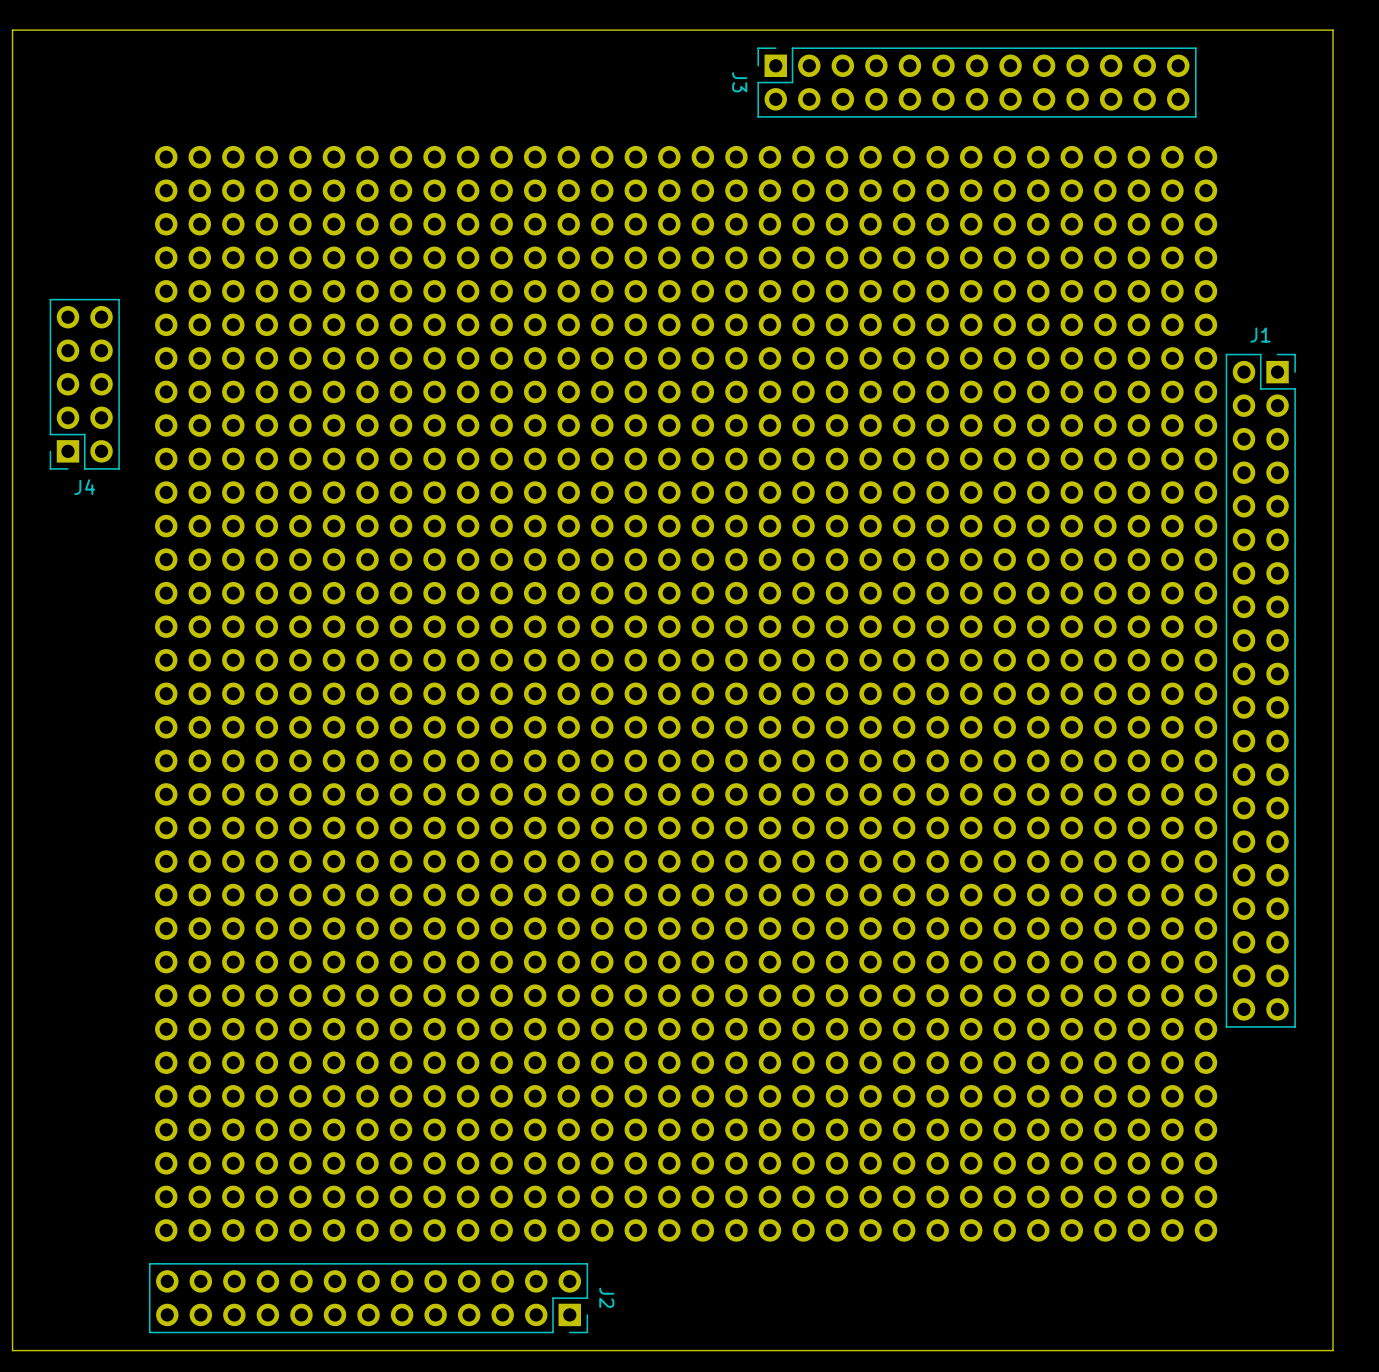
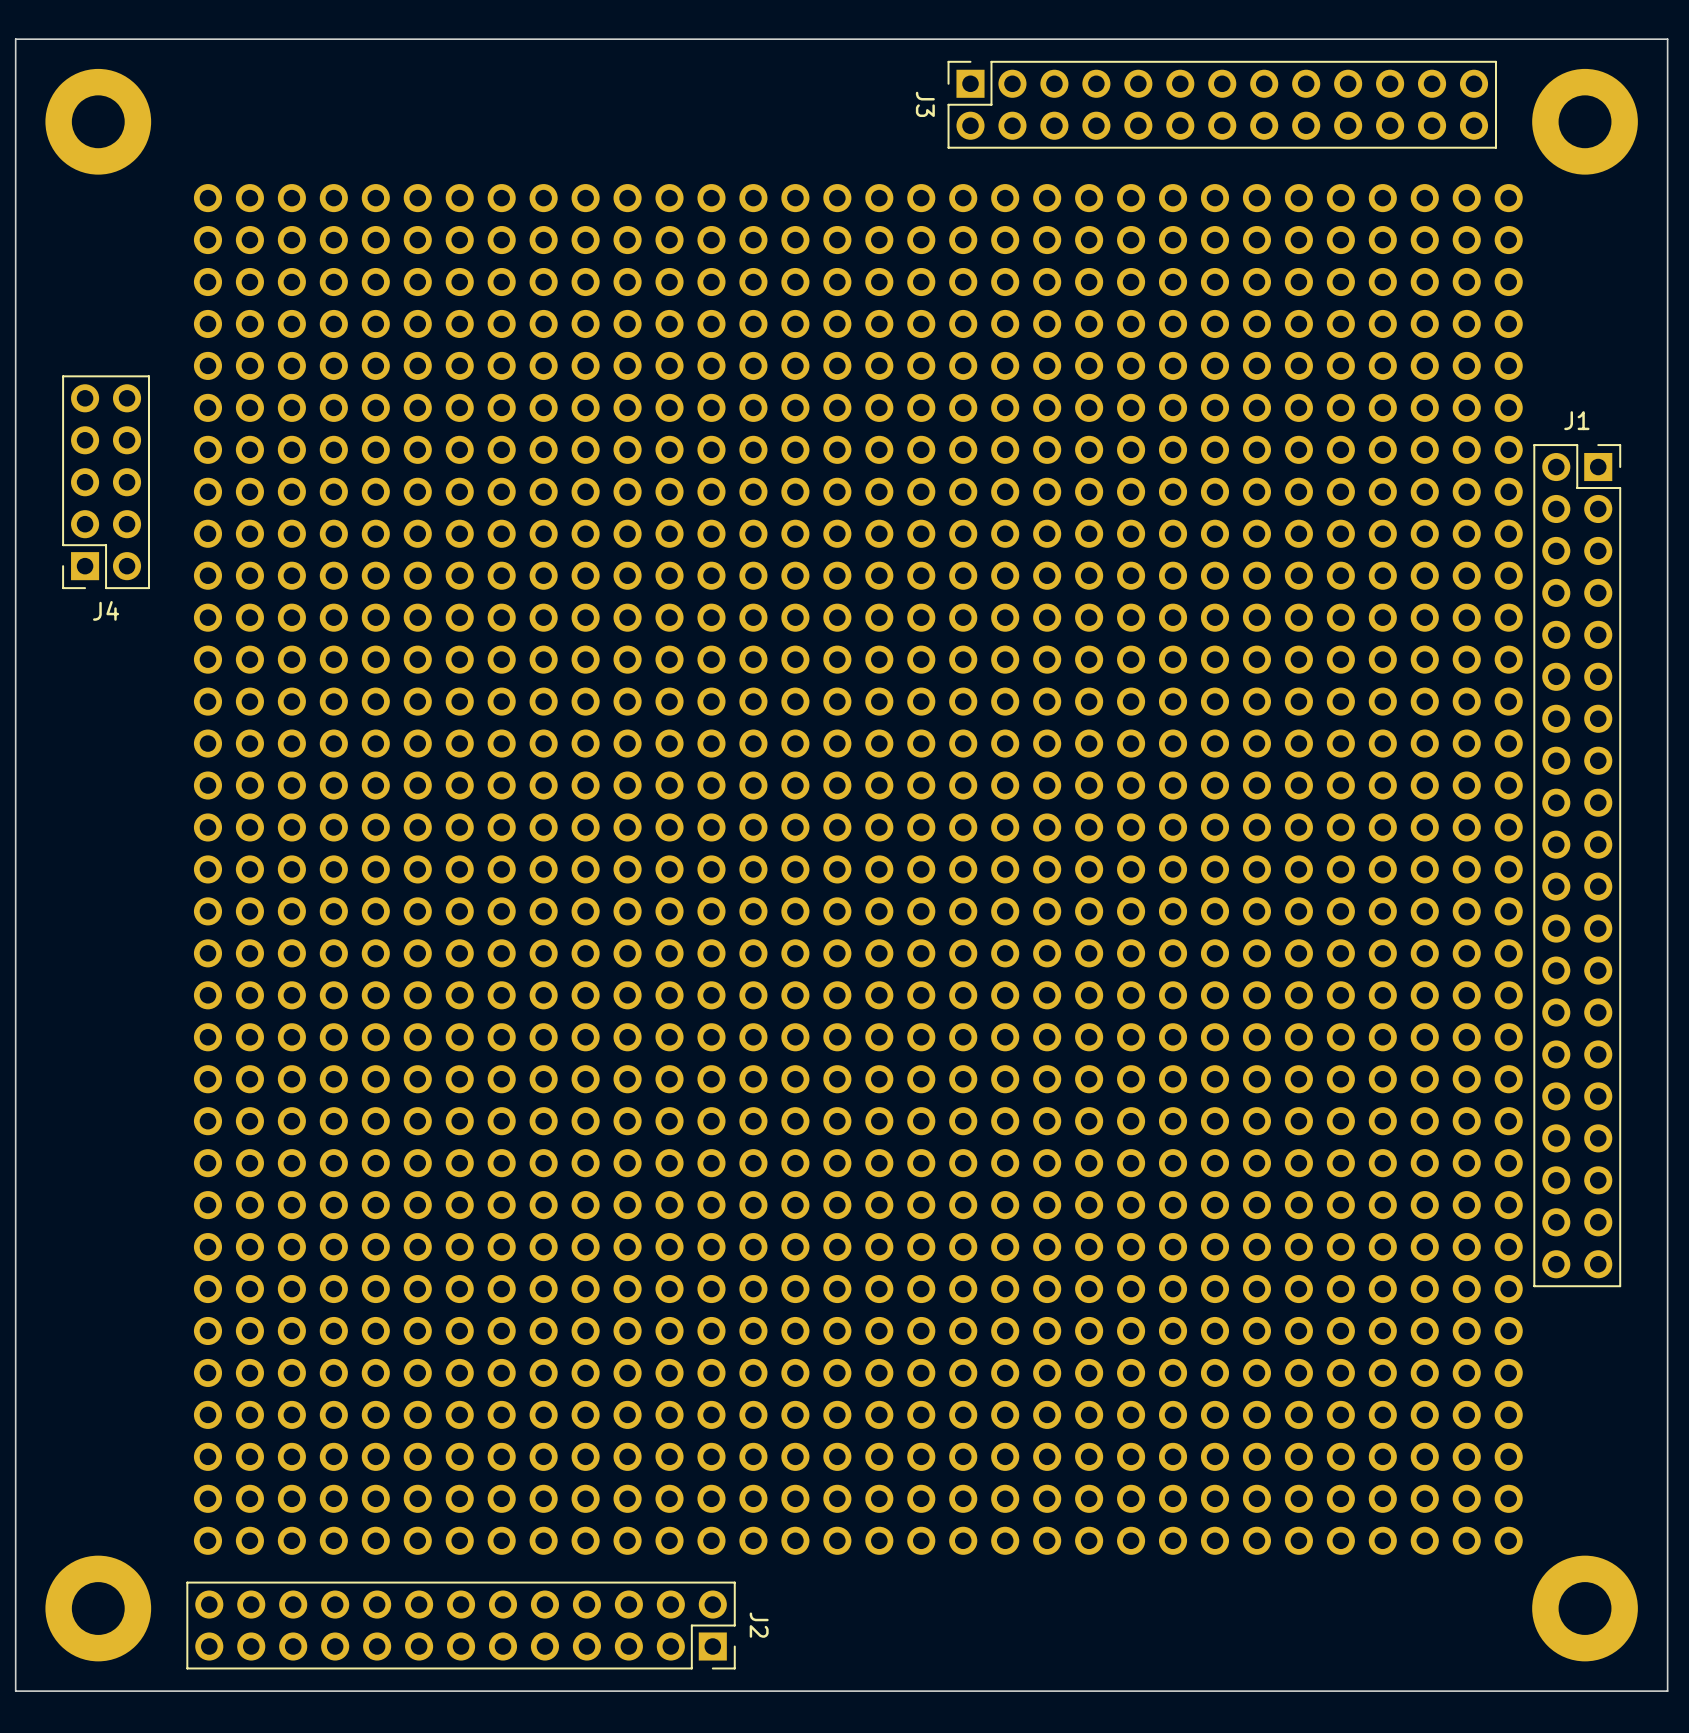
part: none -> (98, 121)
part: none -> (1585, 121)
part: none -> (98, 1608)
part: none -> (1585, 1608)

